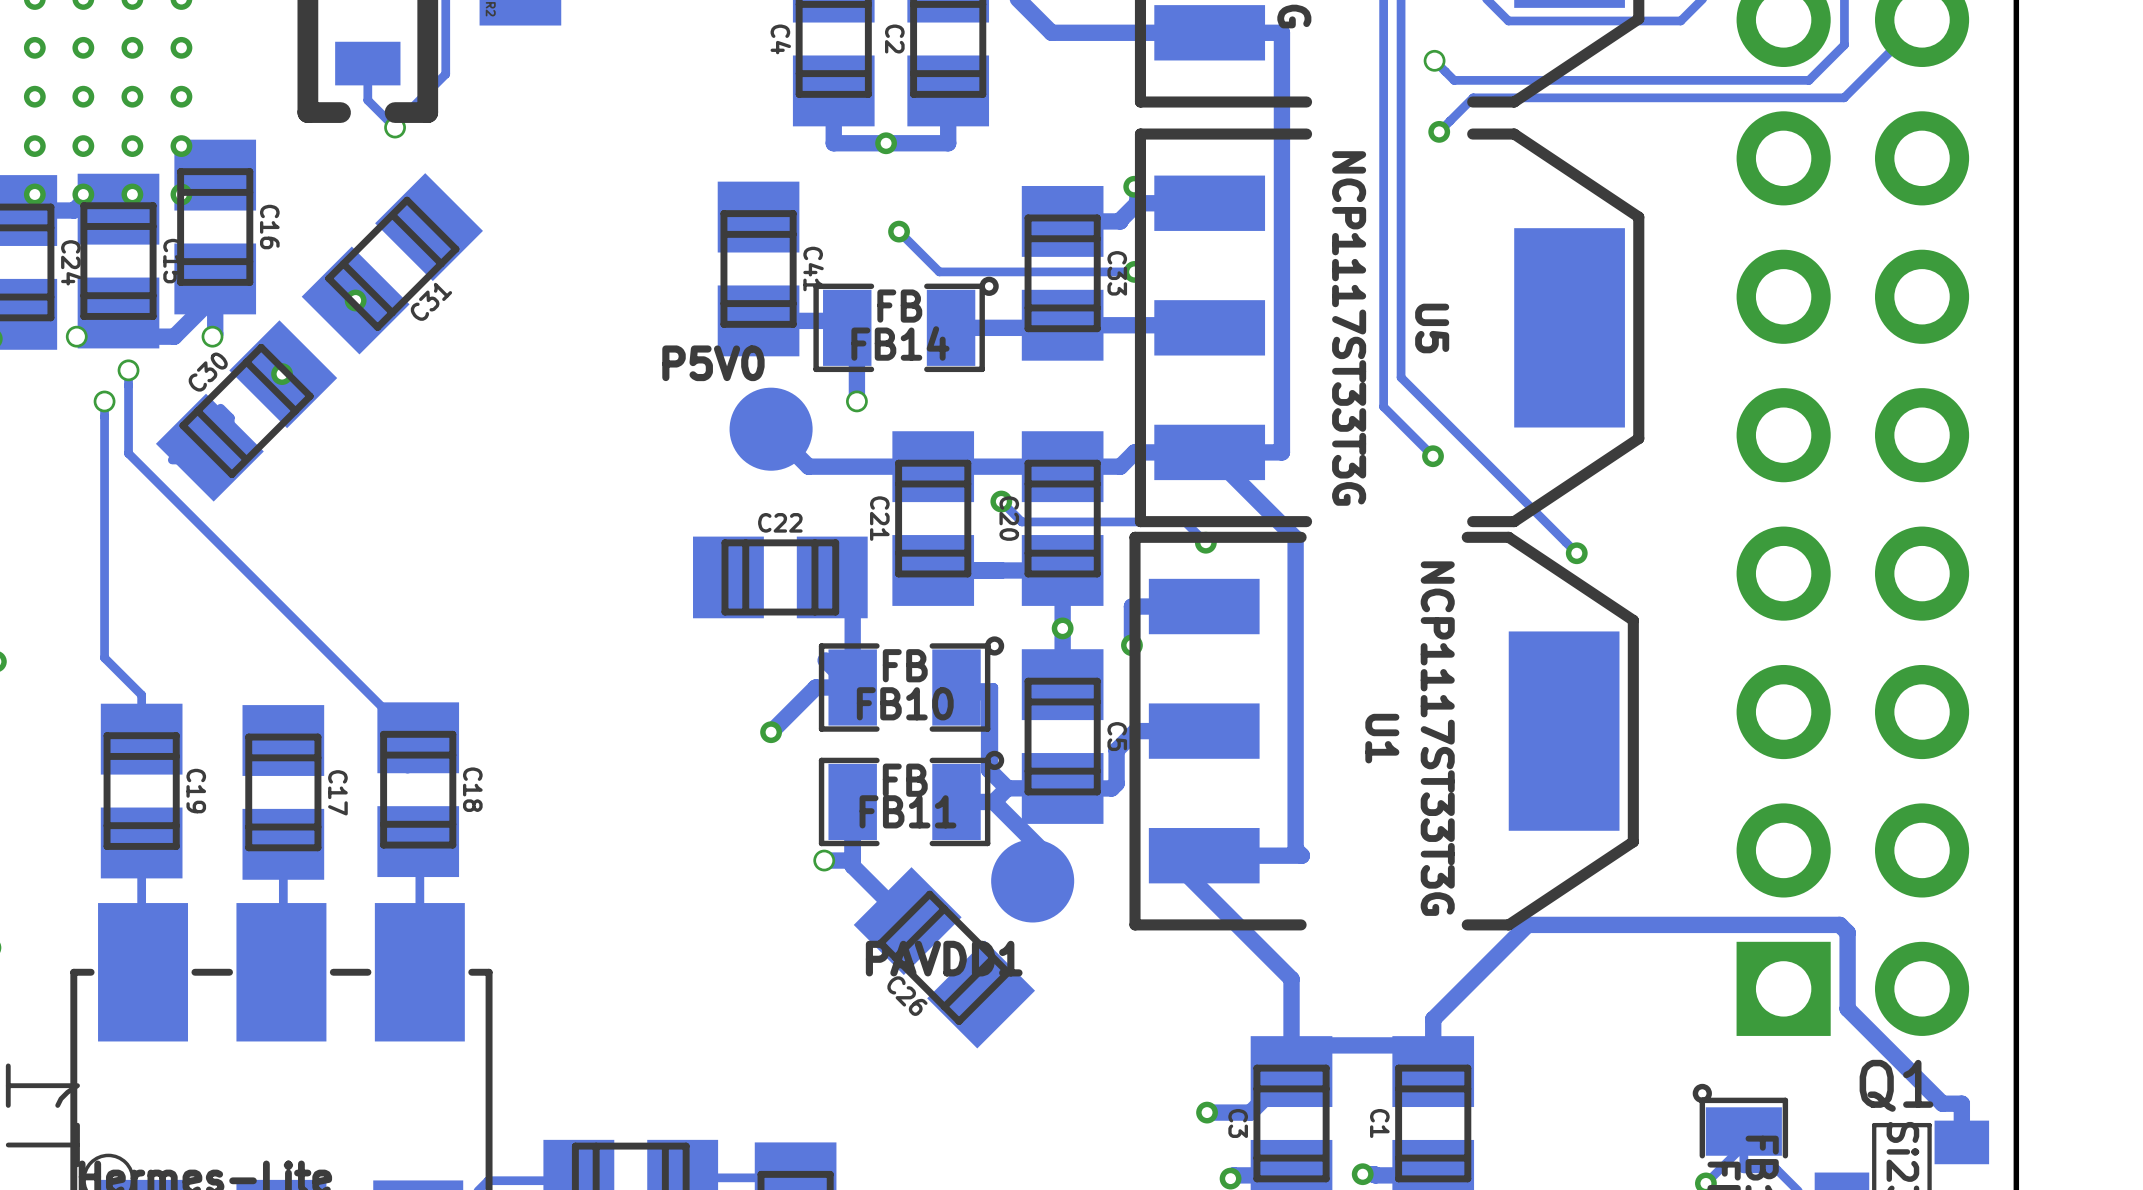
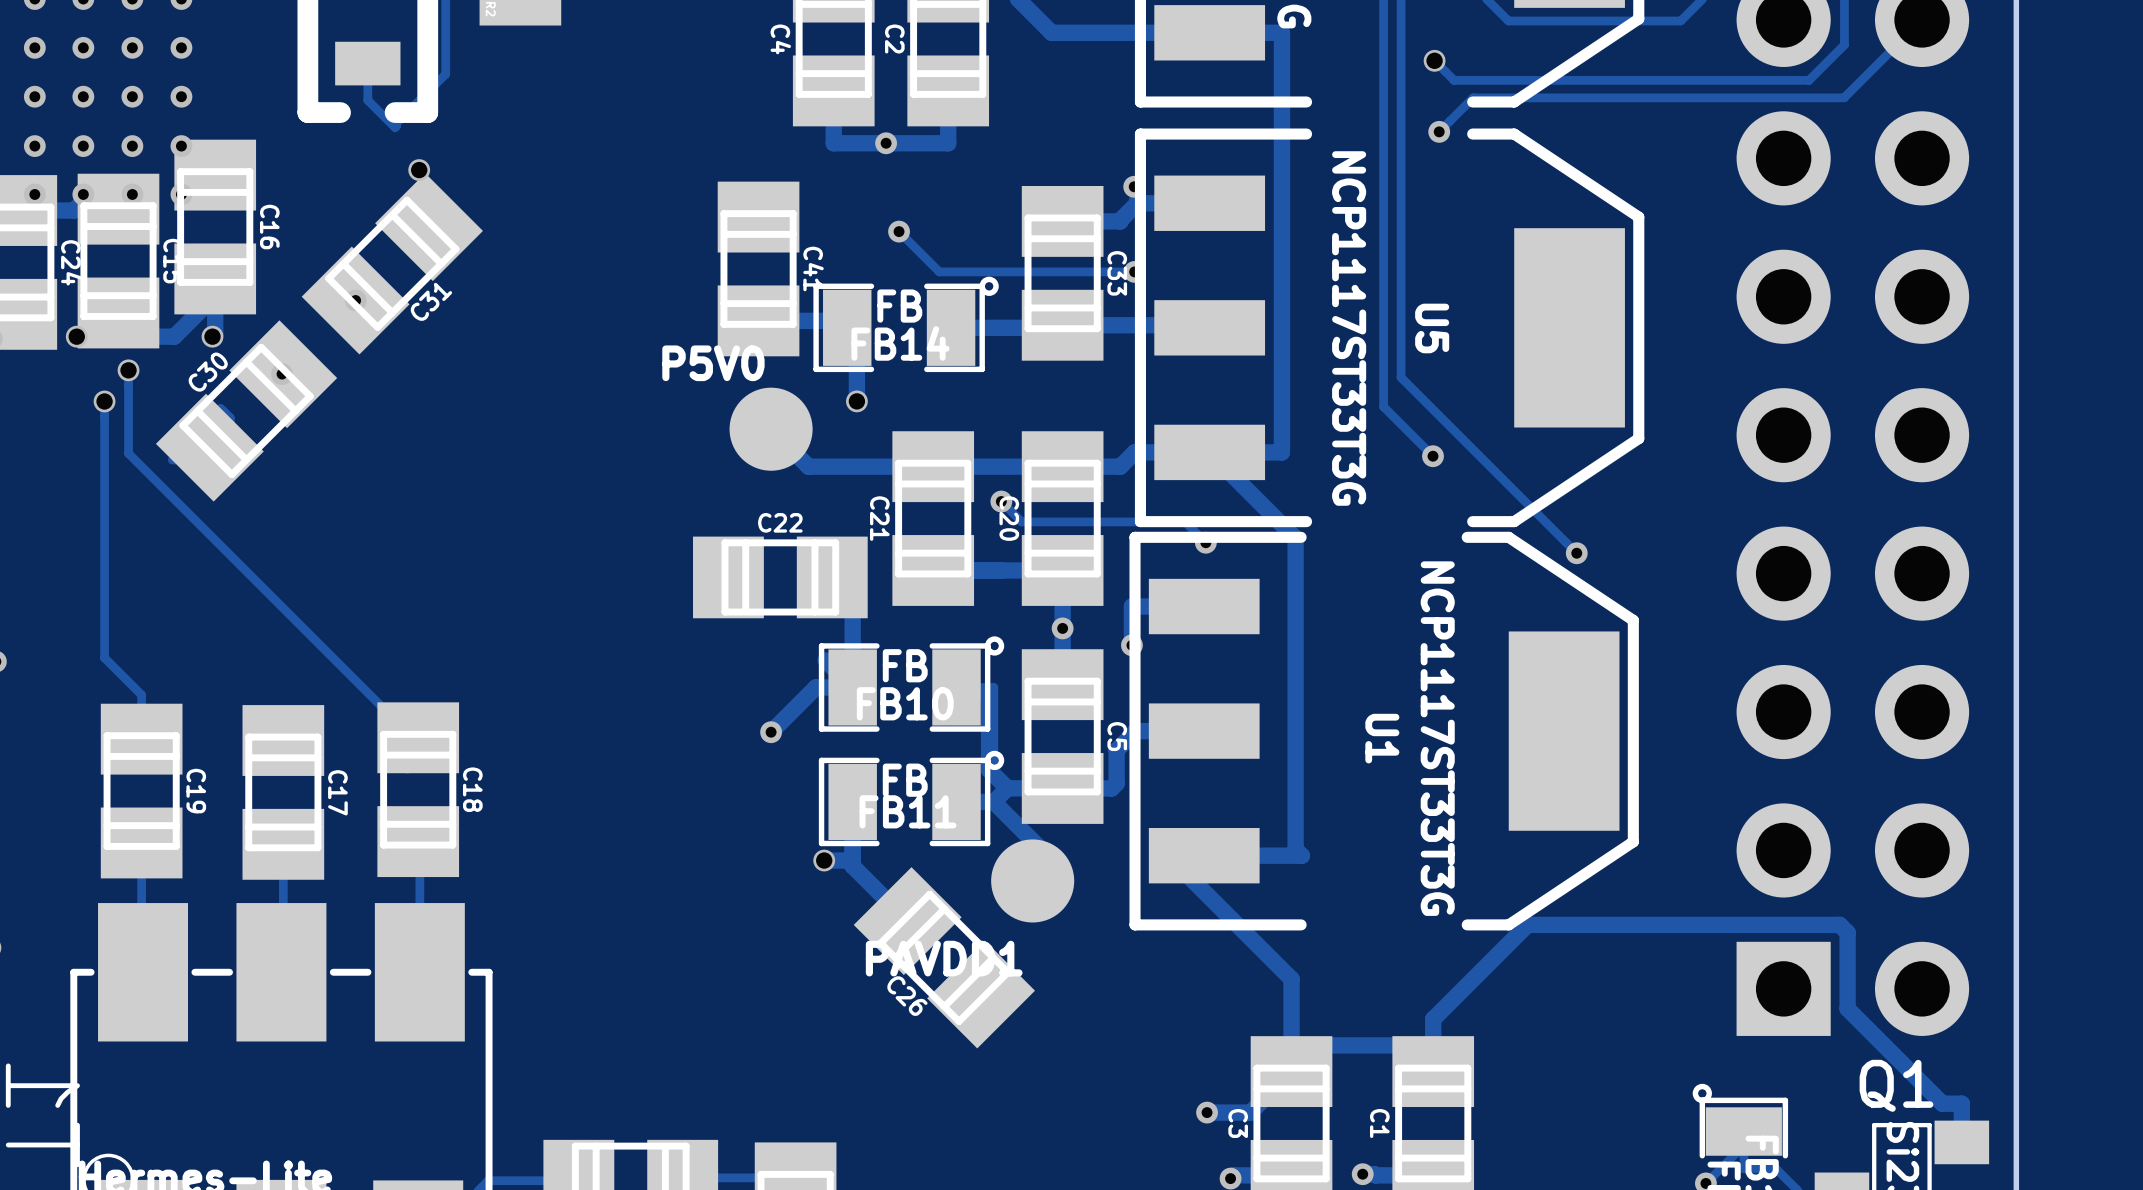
via position: (395, 127) -> (419, 170)

